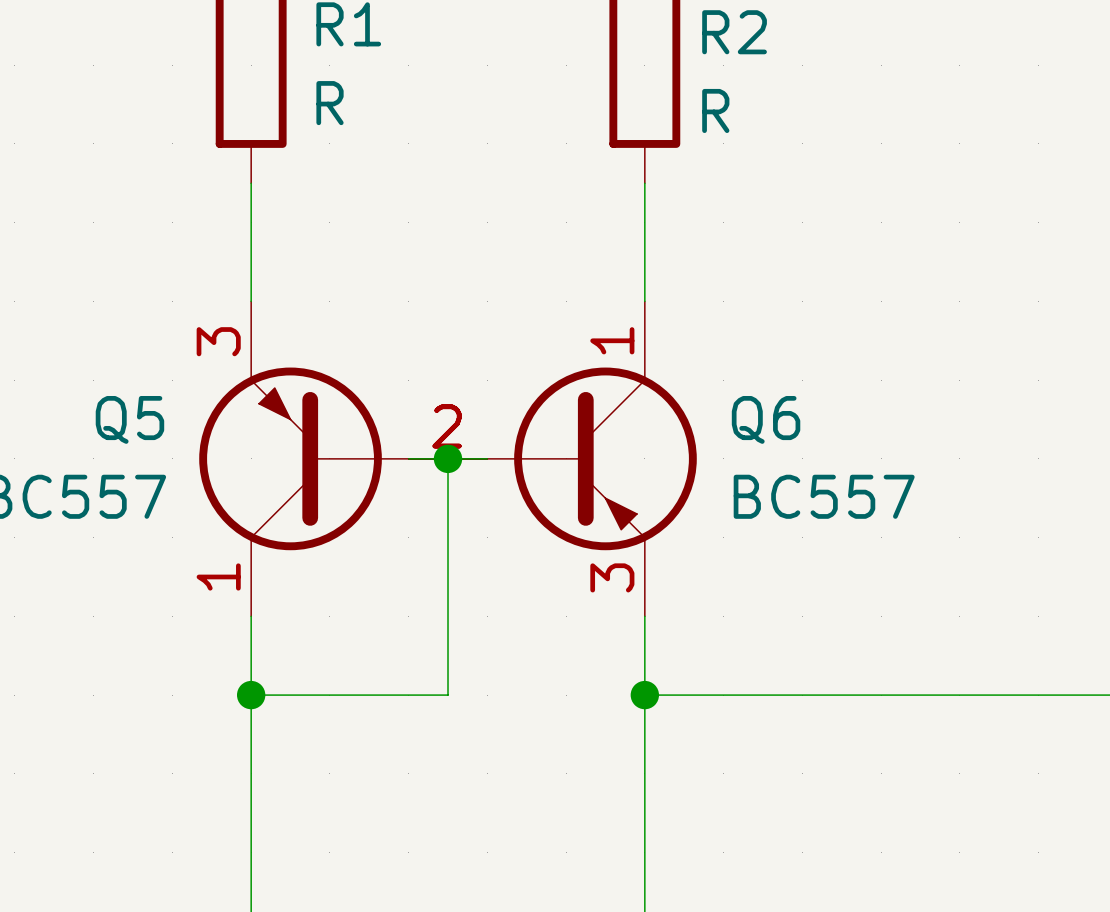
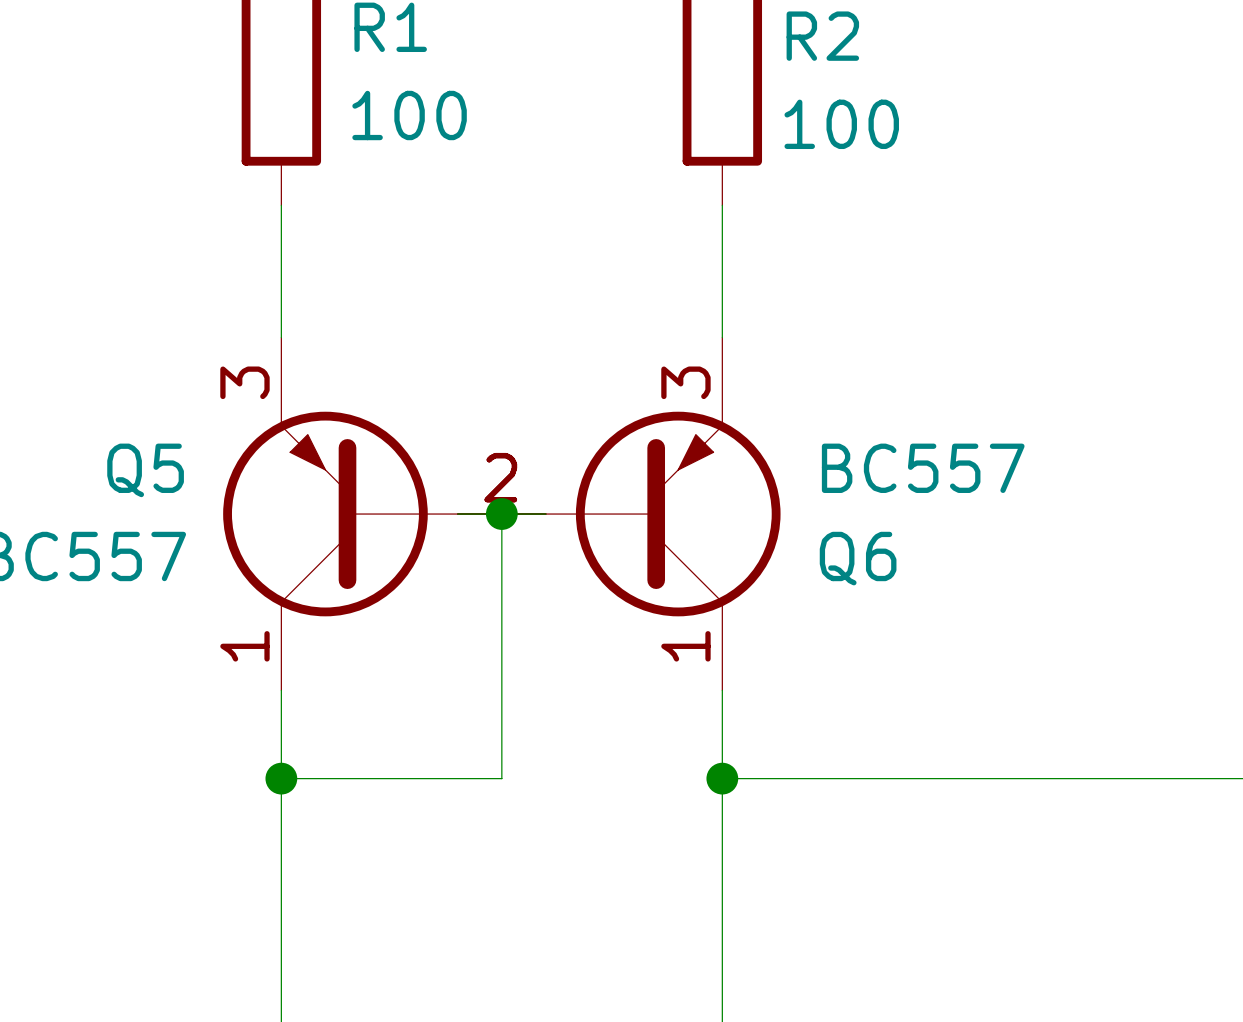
R1 value: R (330, 103) -> 100 (409, 115)
R2 value: R (715, 110) -> 100 (841, 124)
Q6 flip: as is (592, 458) -> up-down (663, 514)

